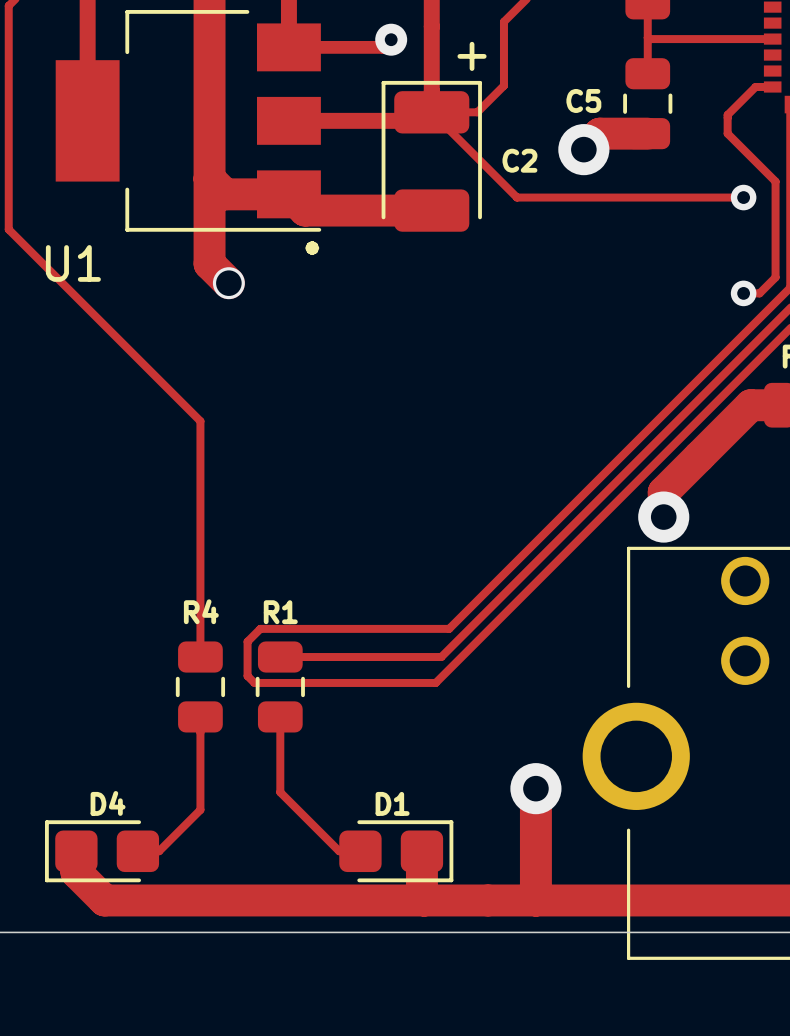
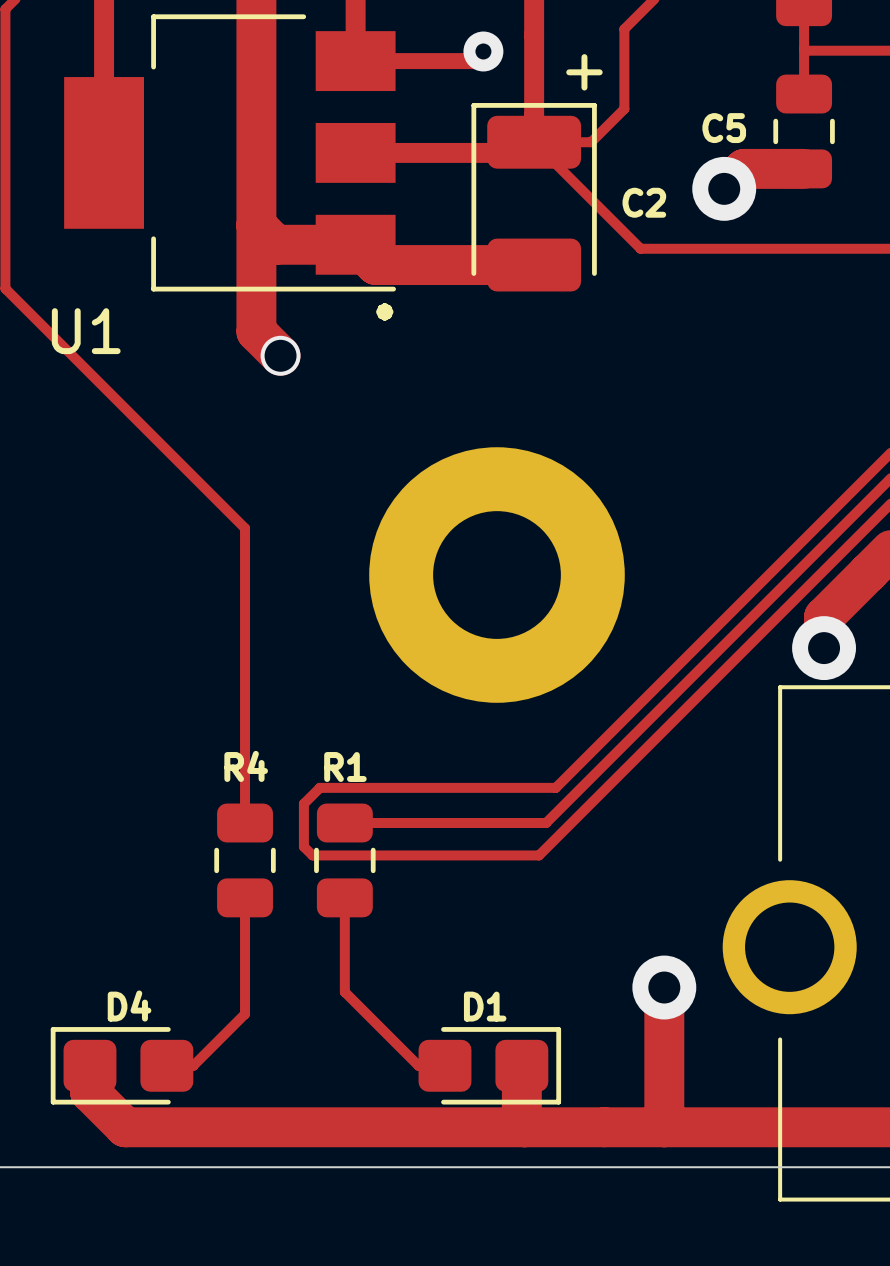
part: none -> (497, 575)

